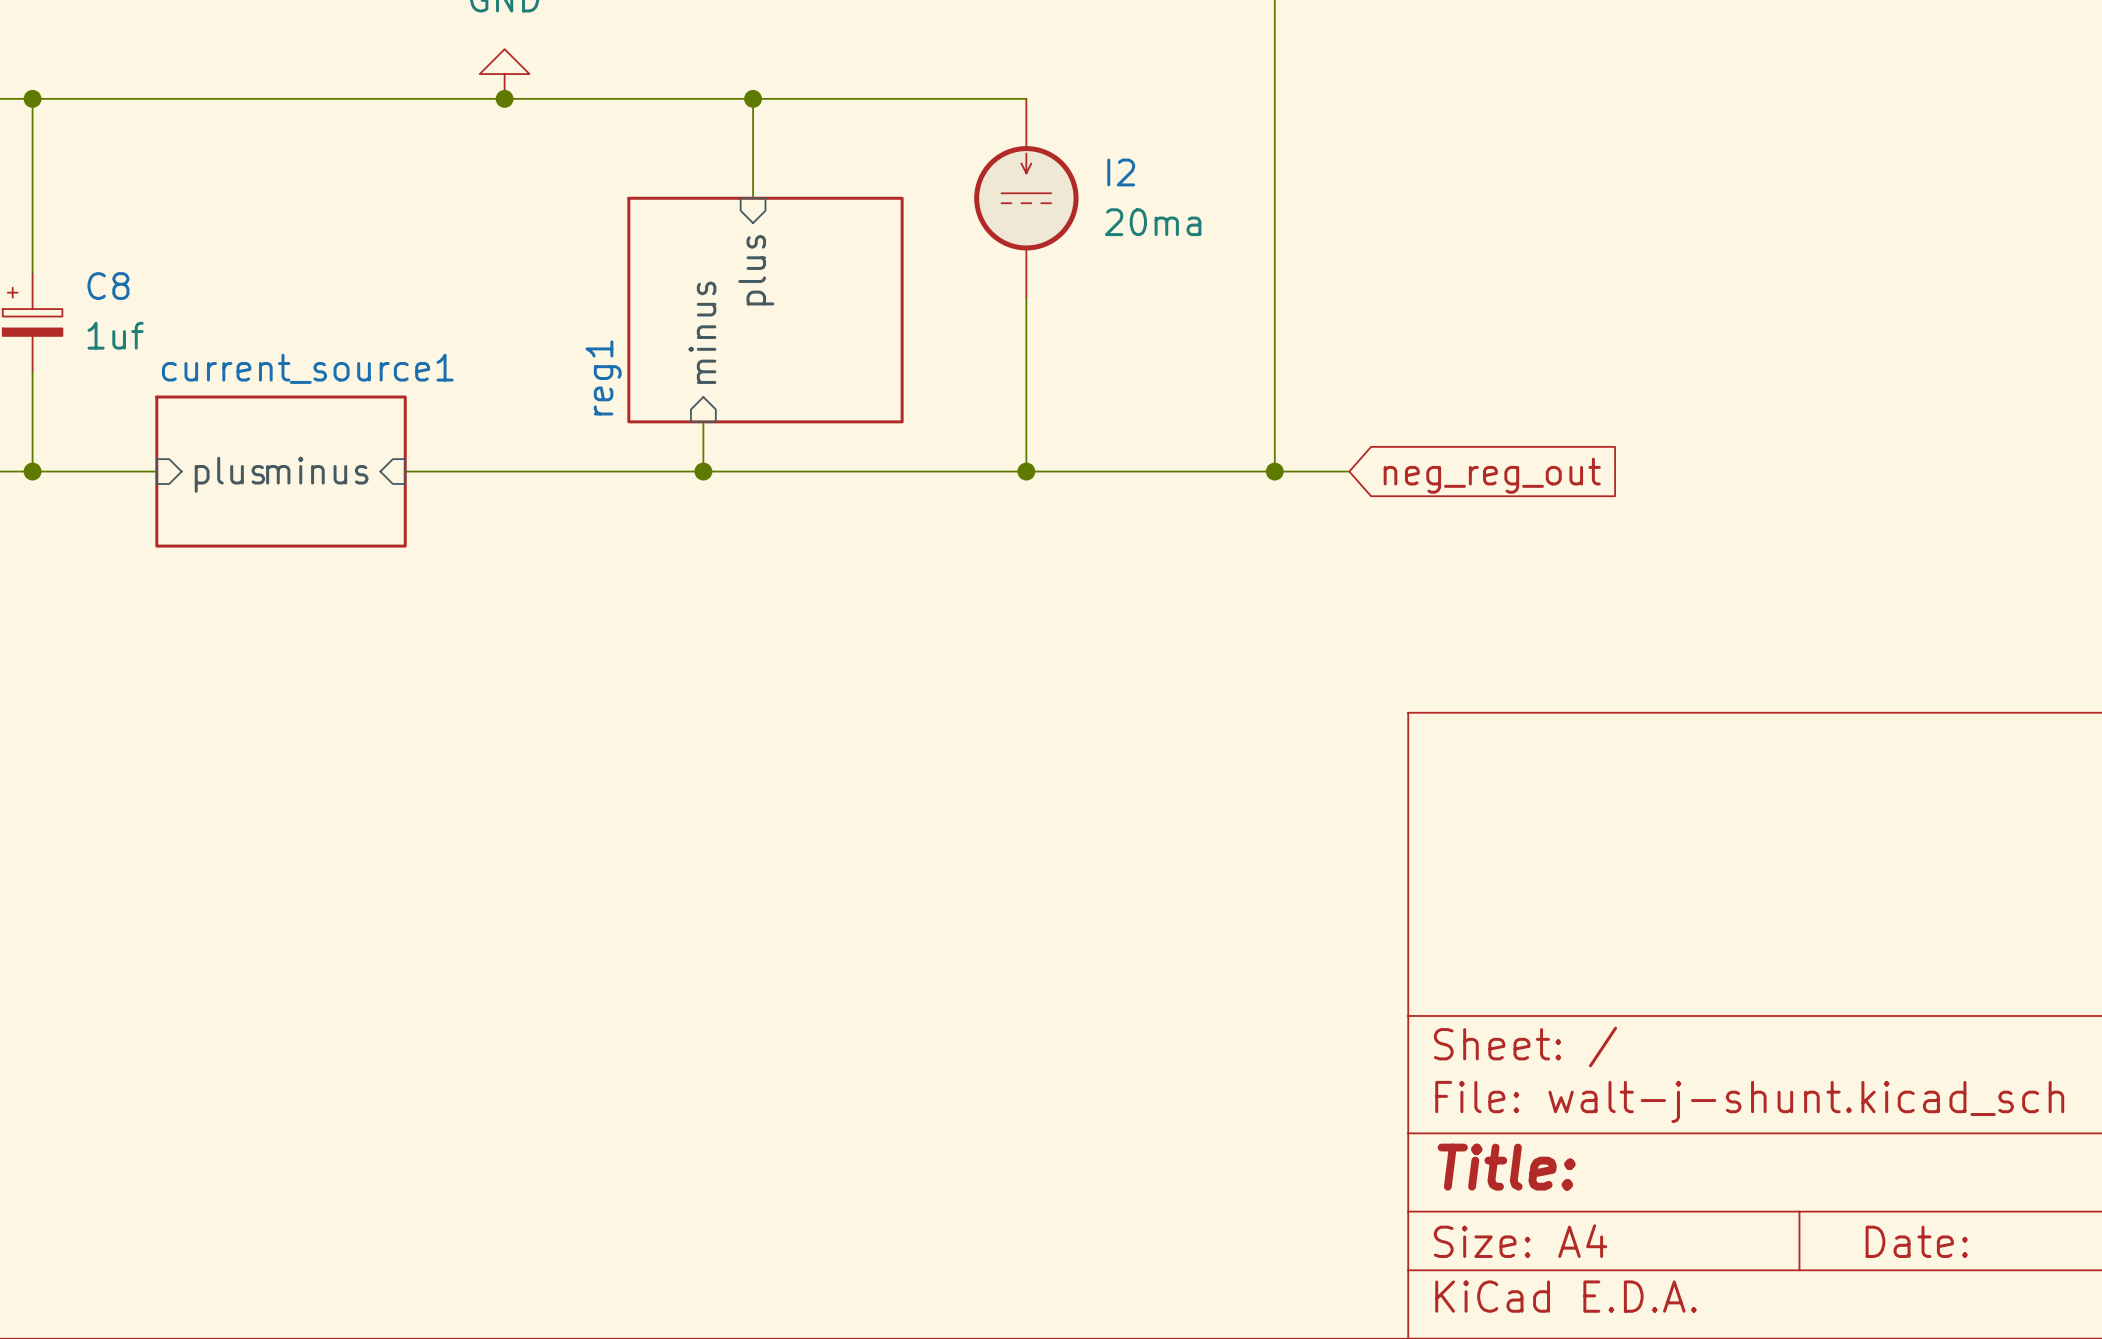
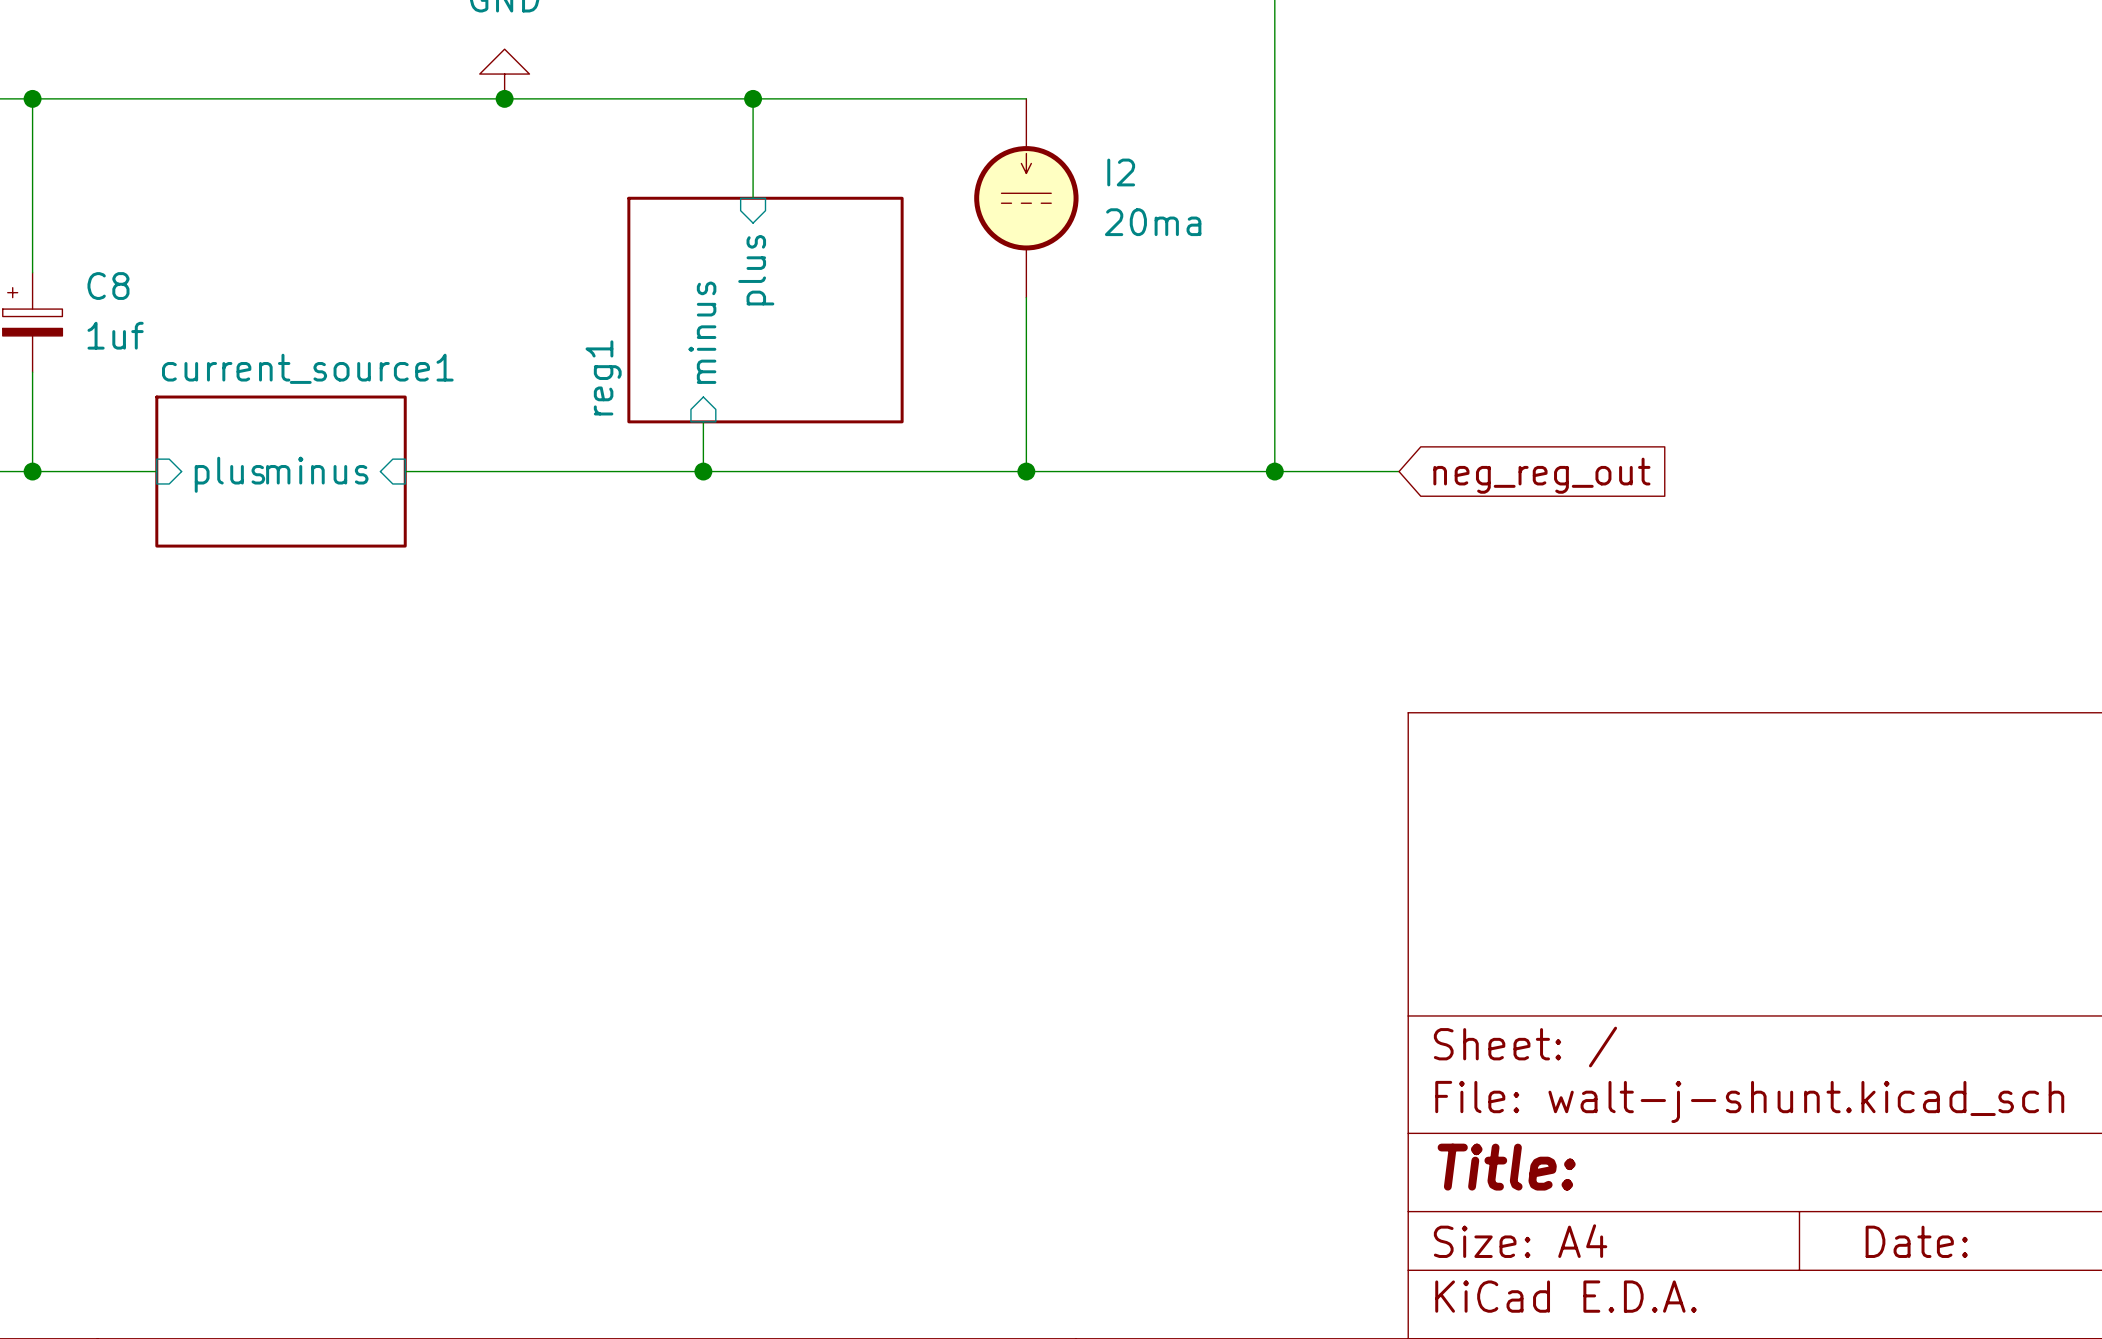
wire: none -> (1349, 471) (1399, 471)
global label position: neg_reg_out (1492, 475) -> neg_reg_out (1541, 475)

